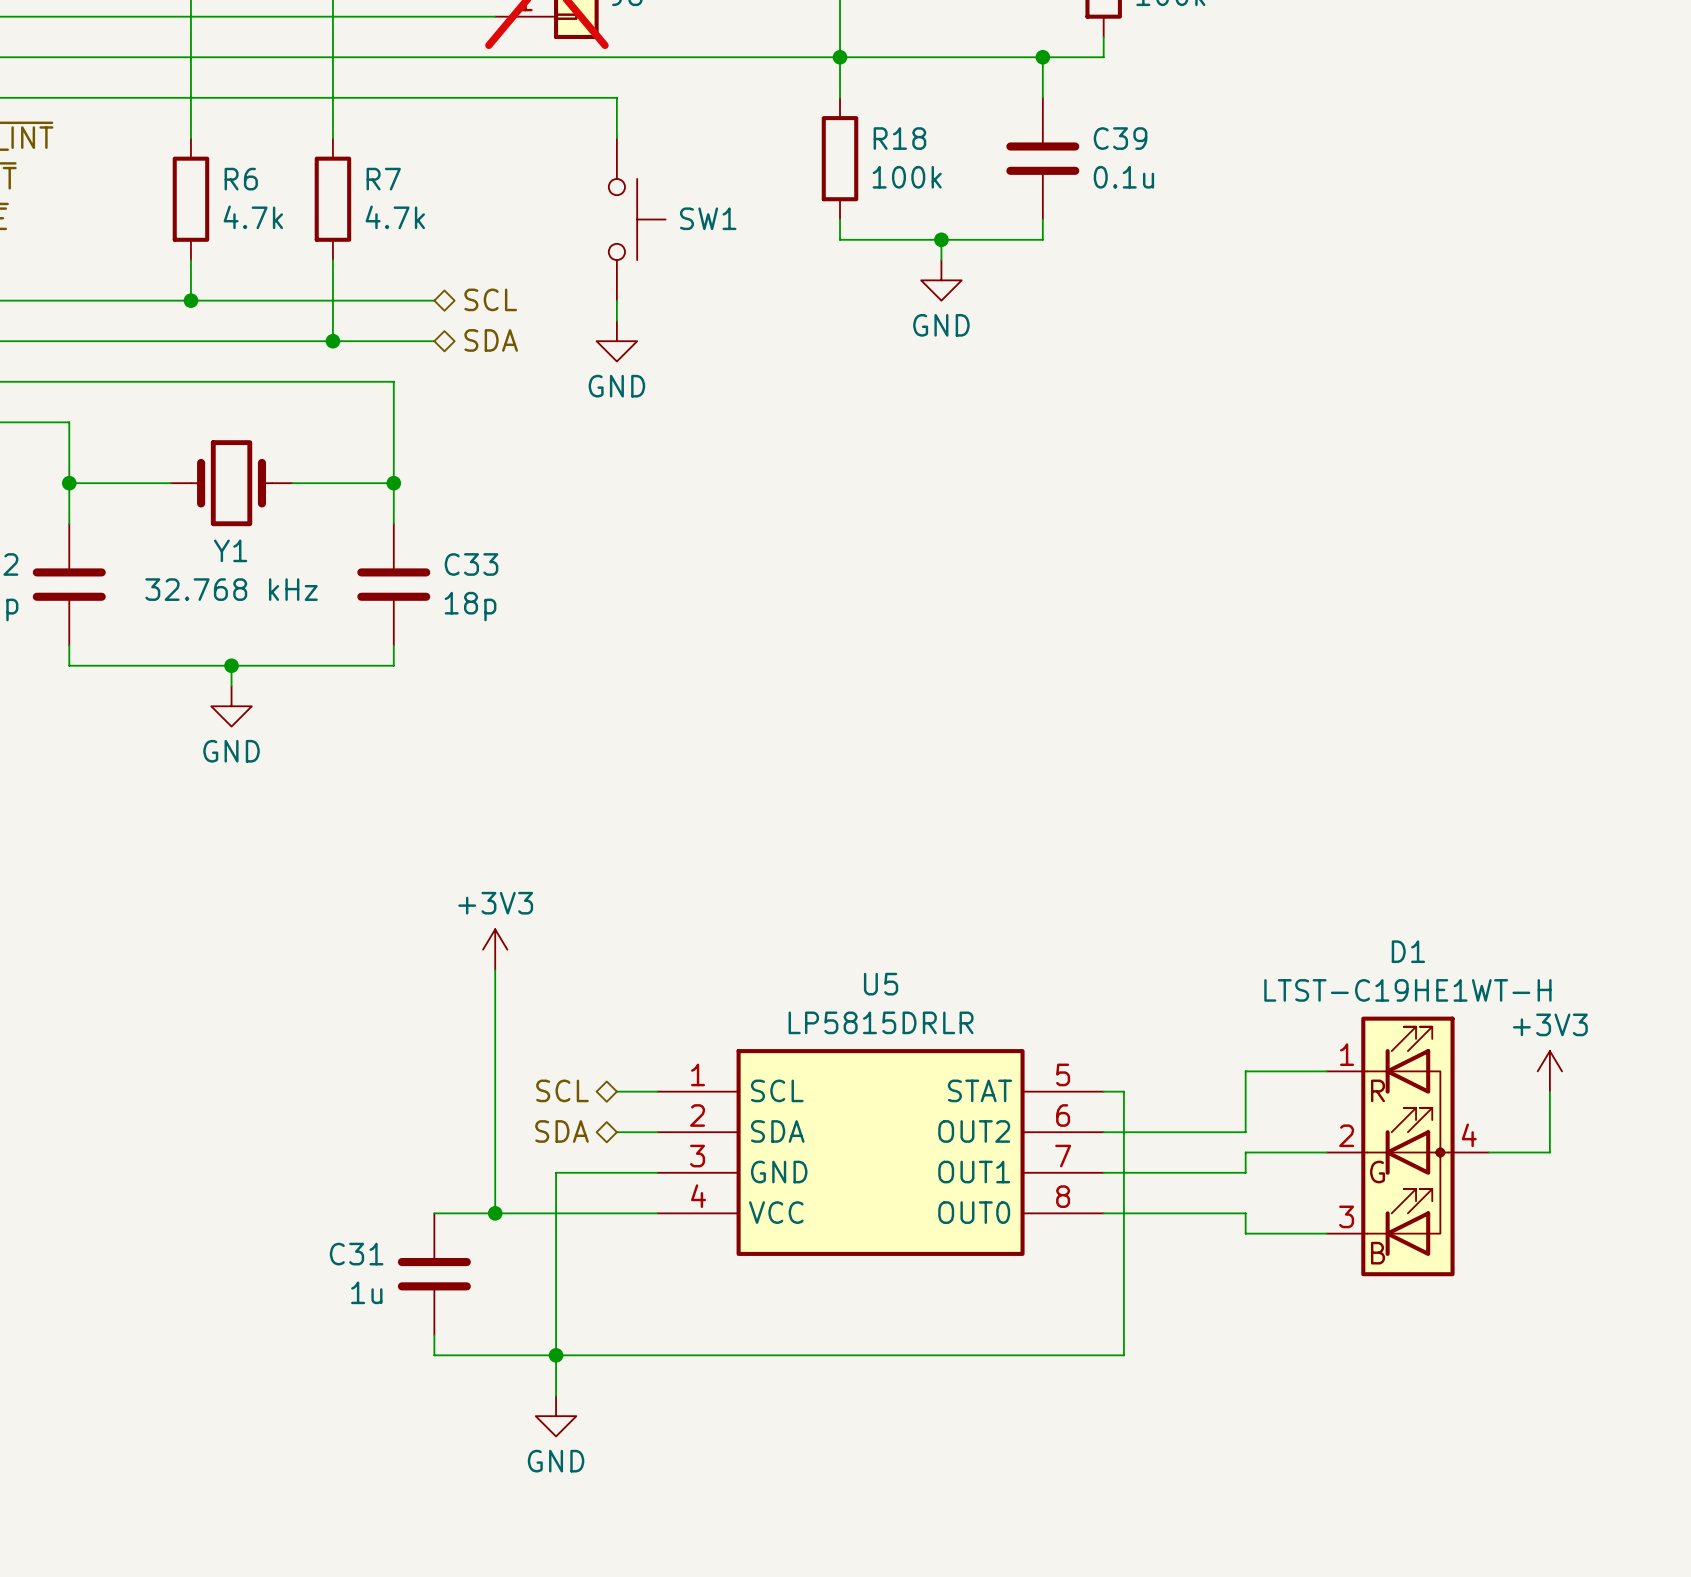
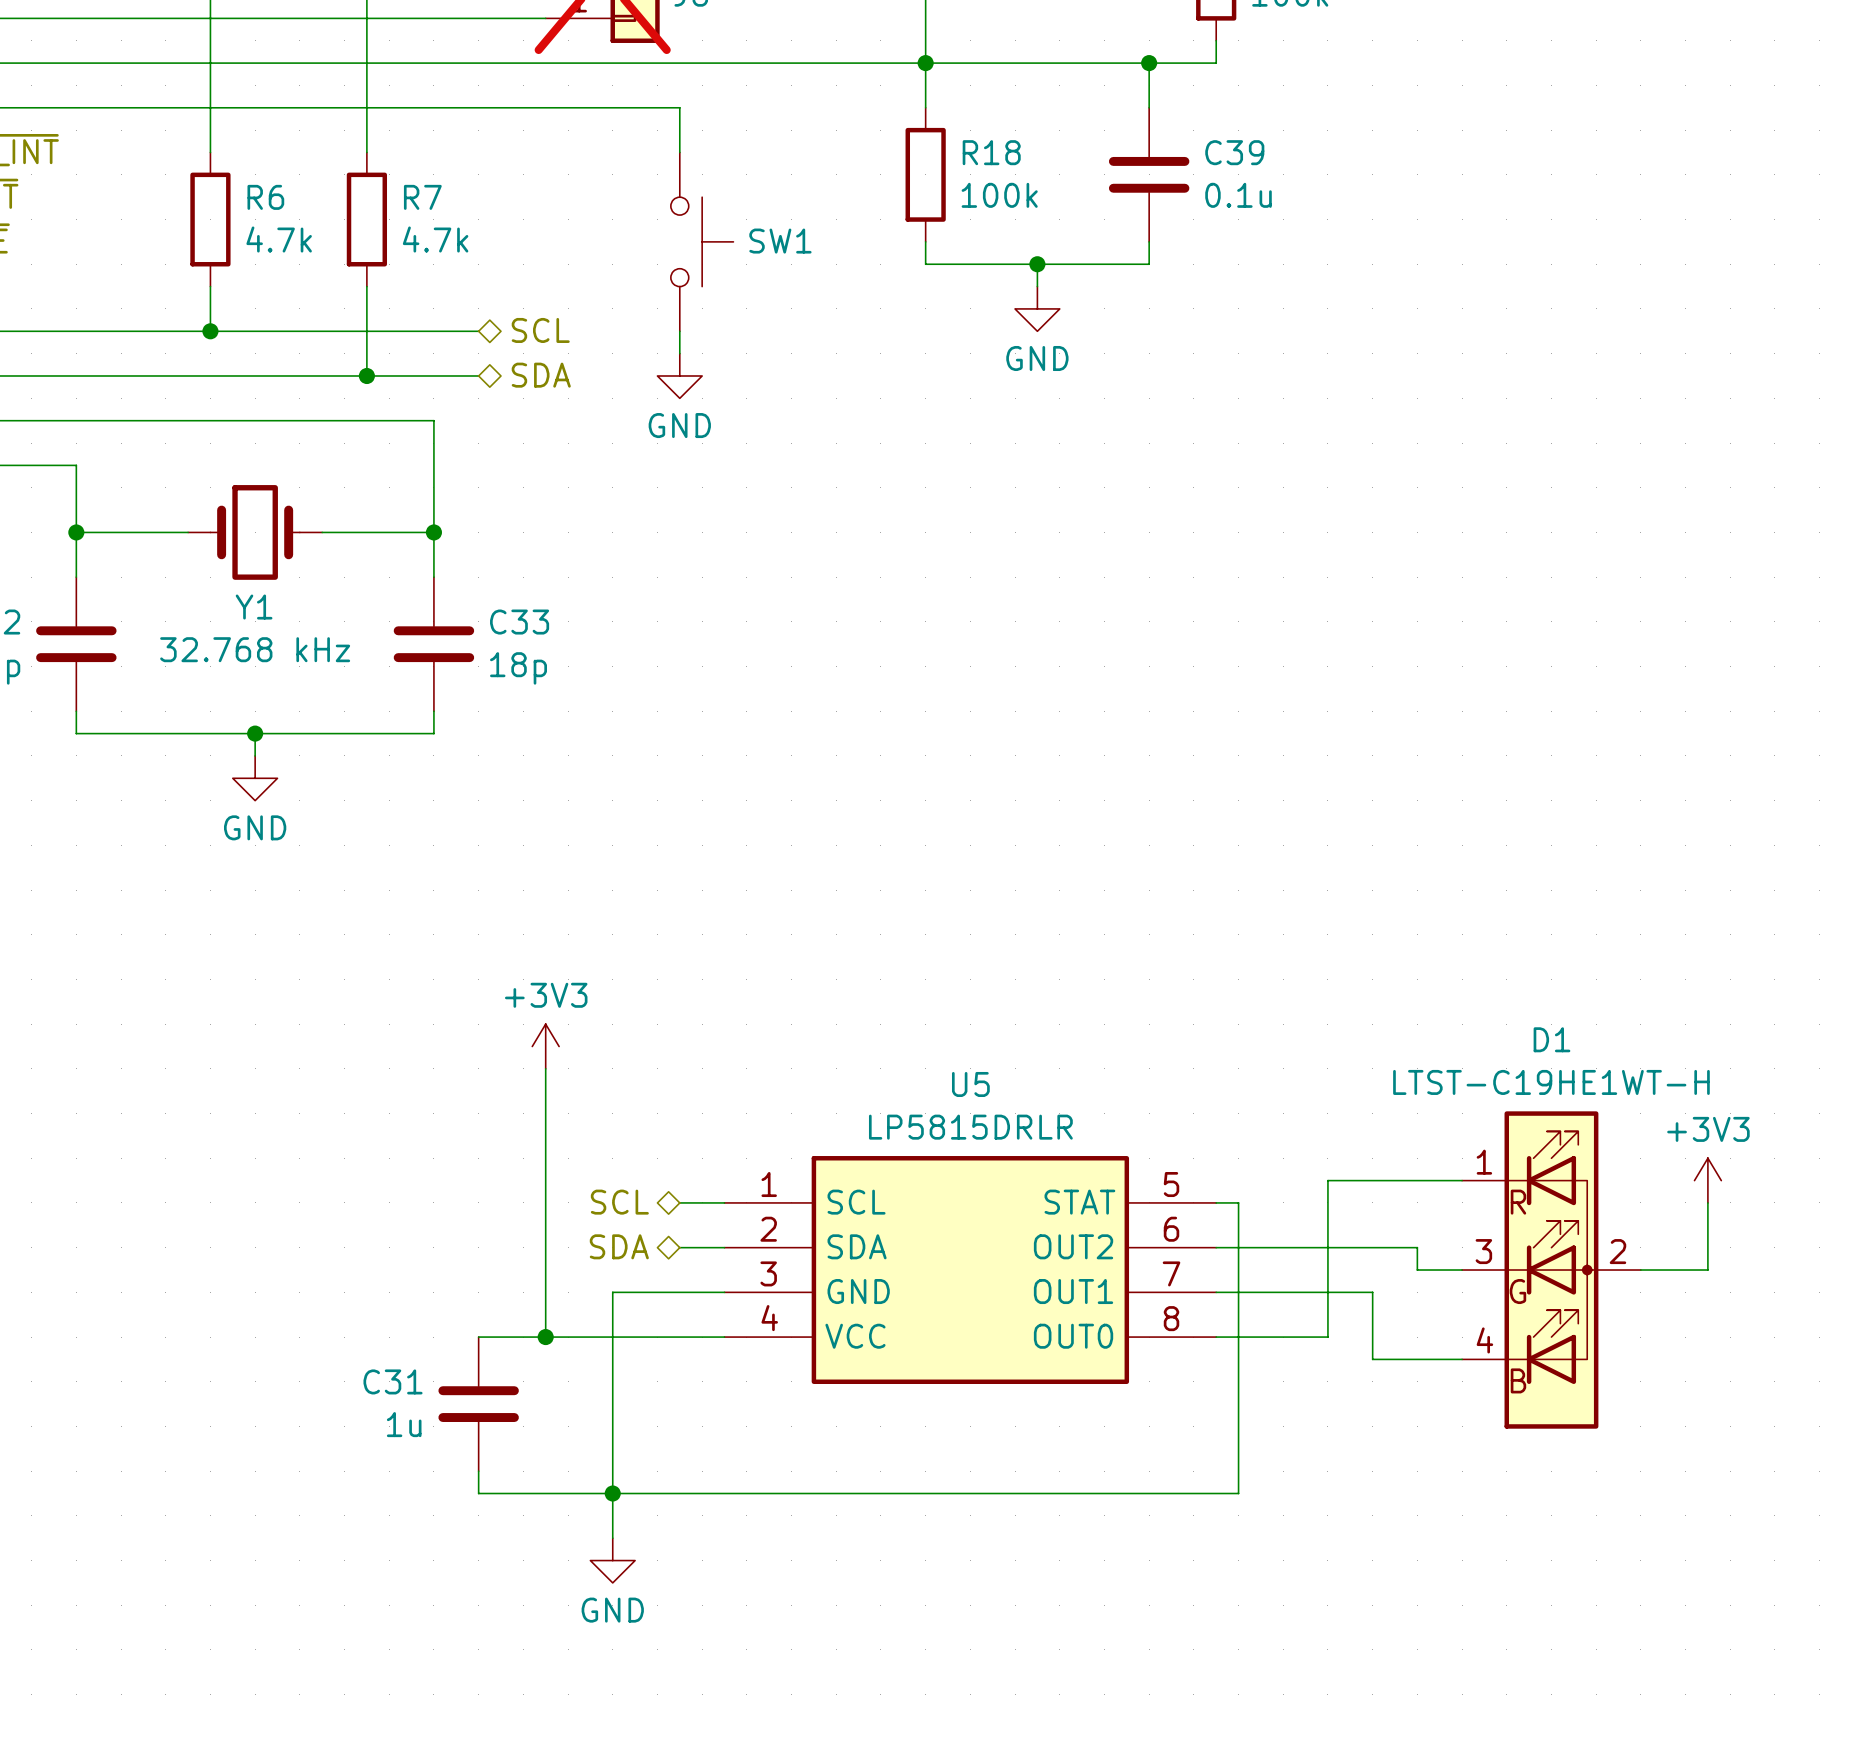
D1 symbol: [1326, 1016, 1490, 1277] -> [1462, 1111, 1641, 1429]
wire: (1245, 1071) (1245, 1132) -> (1372, 1180) (1327, 1180) (1327, 1337)
wire: (1286, 1152) (1245, 1152) (1245, 1172) -> (1417, 1270) (1417, 1247) (1372, 1247)
wire: (1205, 1213) (1245, 1213) -> (1372, 1292) (1372, 1337)

